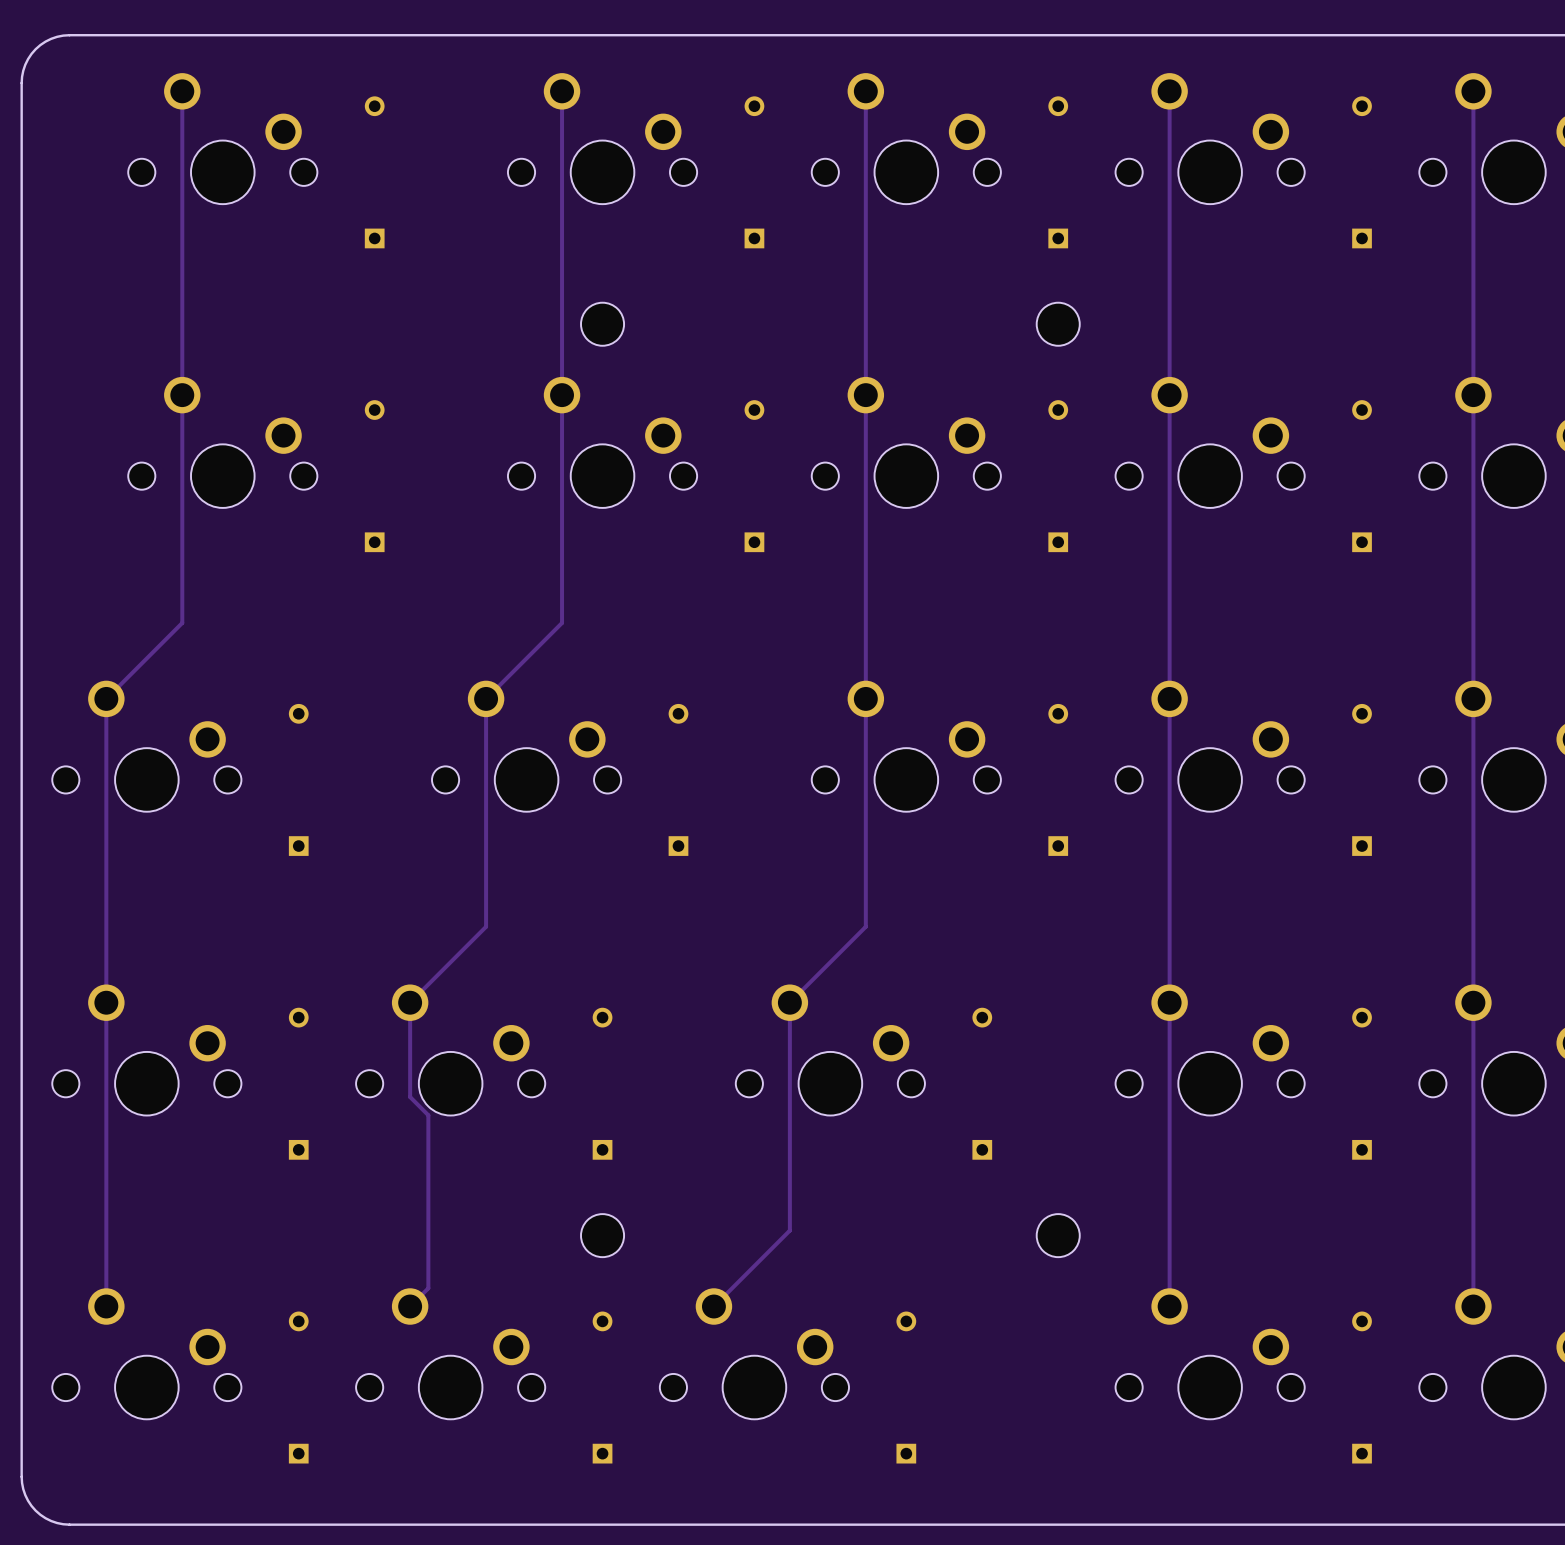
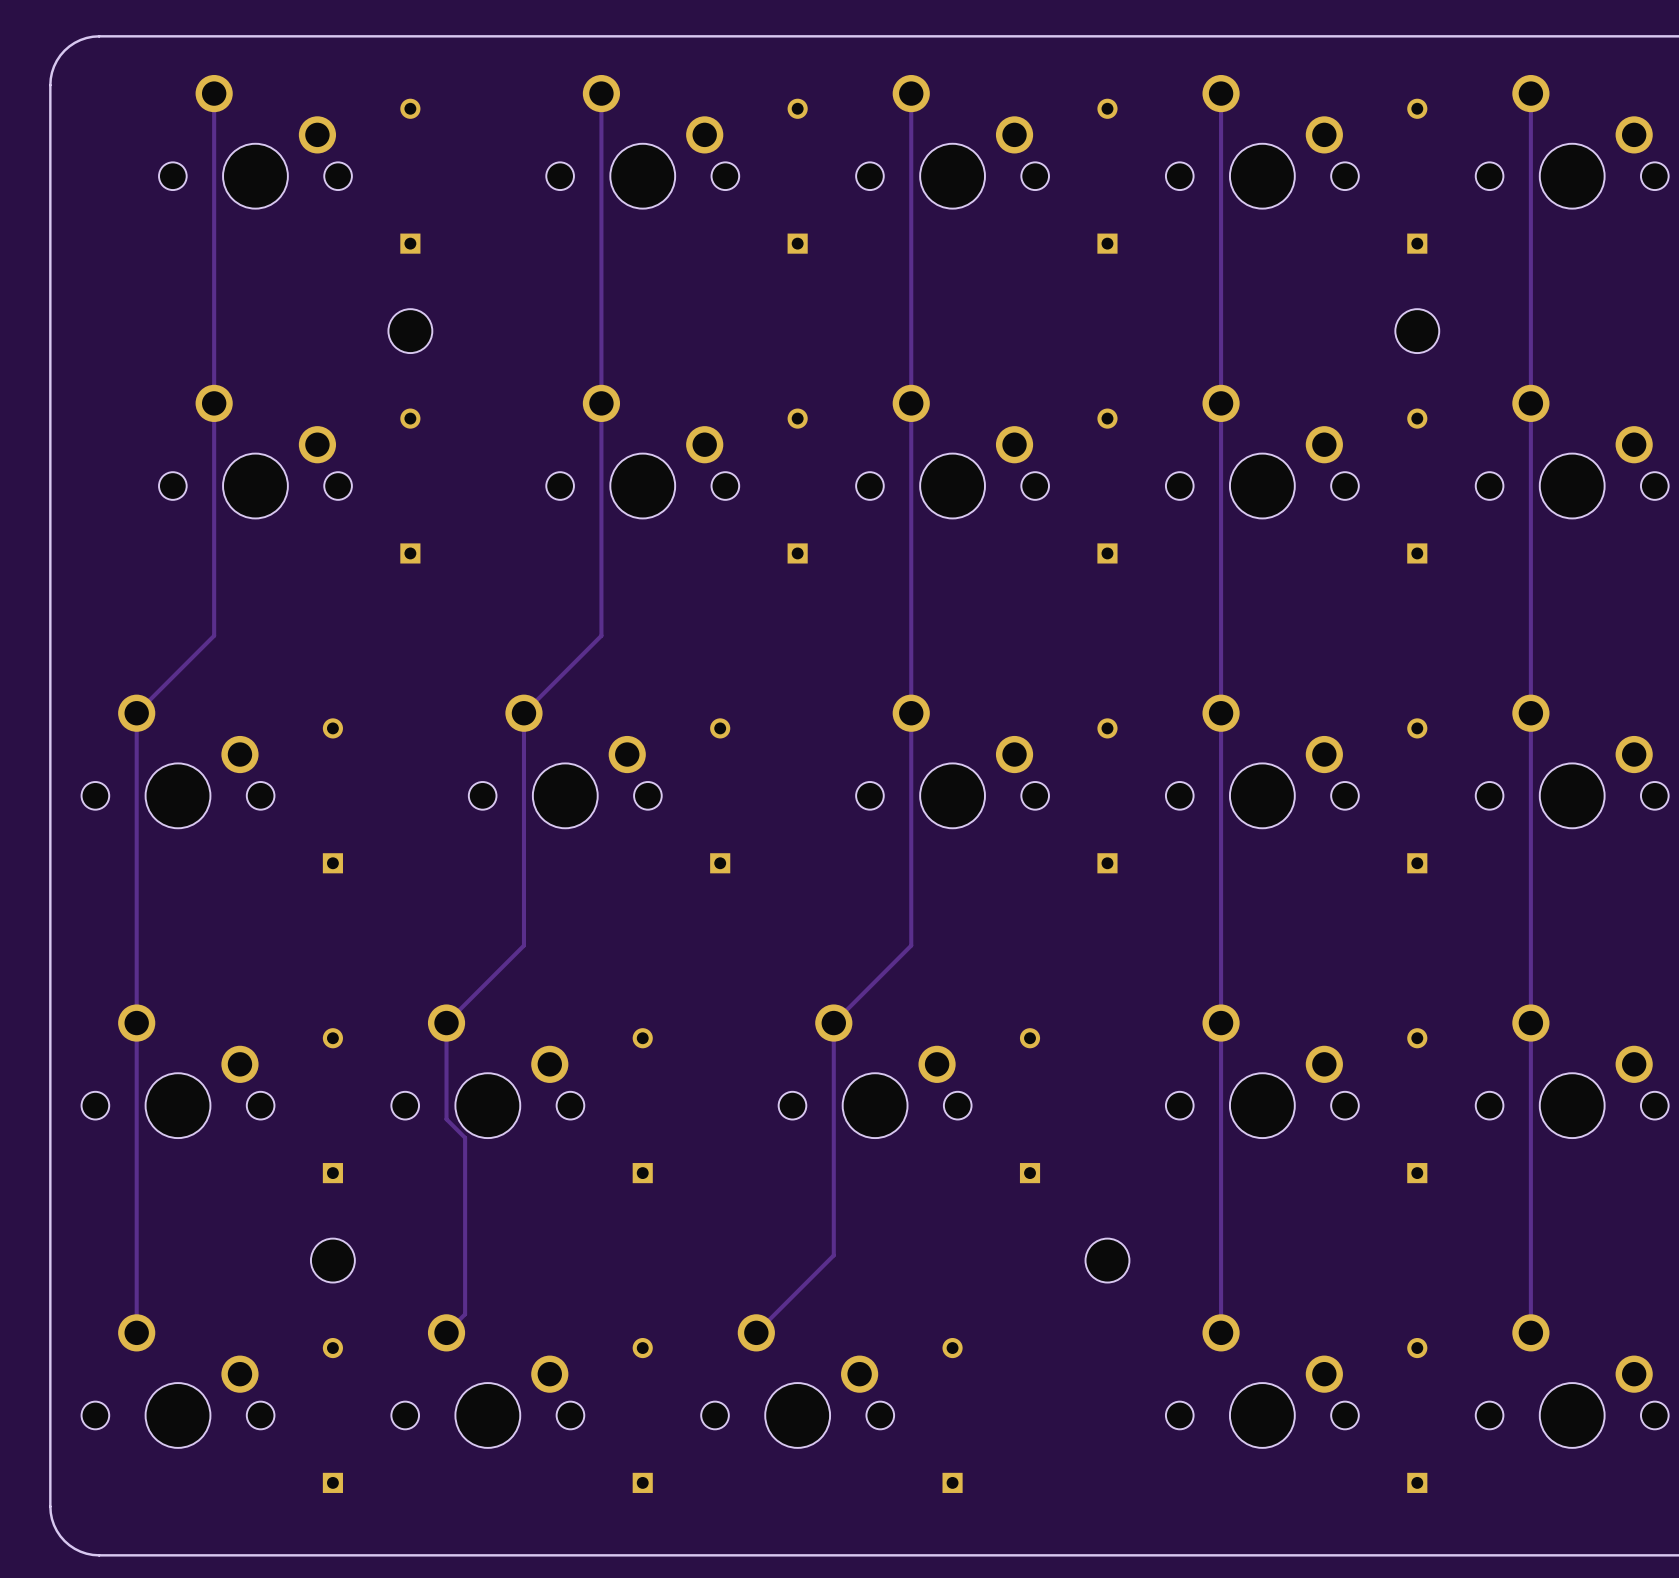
part position: (602, 324) -> (410, 331)
part position: (1058, 324) -> (1417, 331)
part position: (602, 1235) -> (332, 1260)

